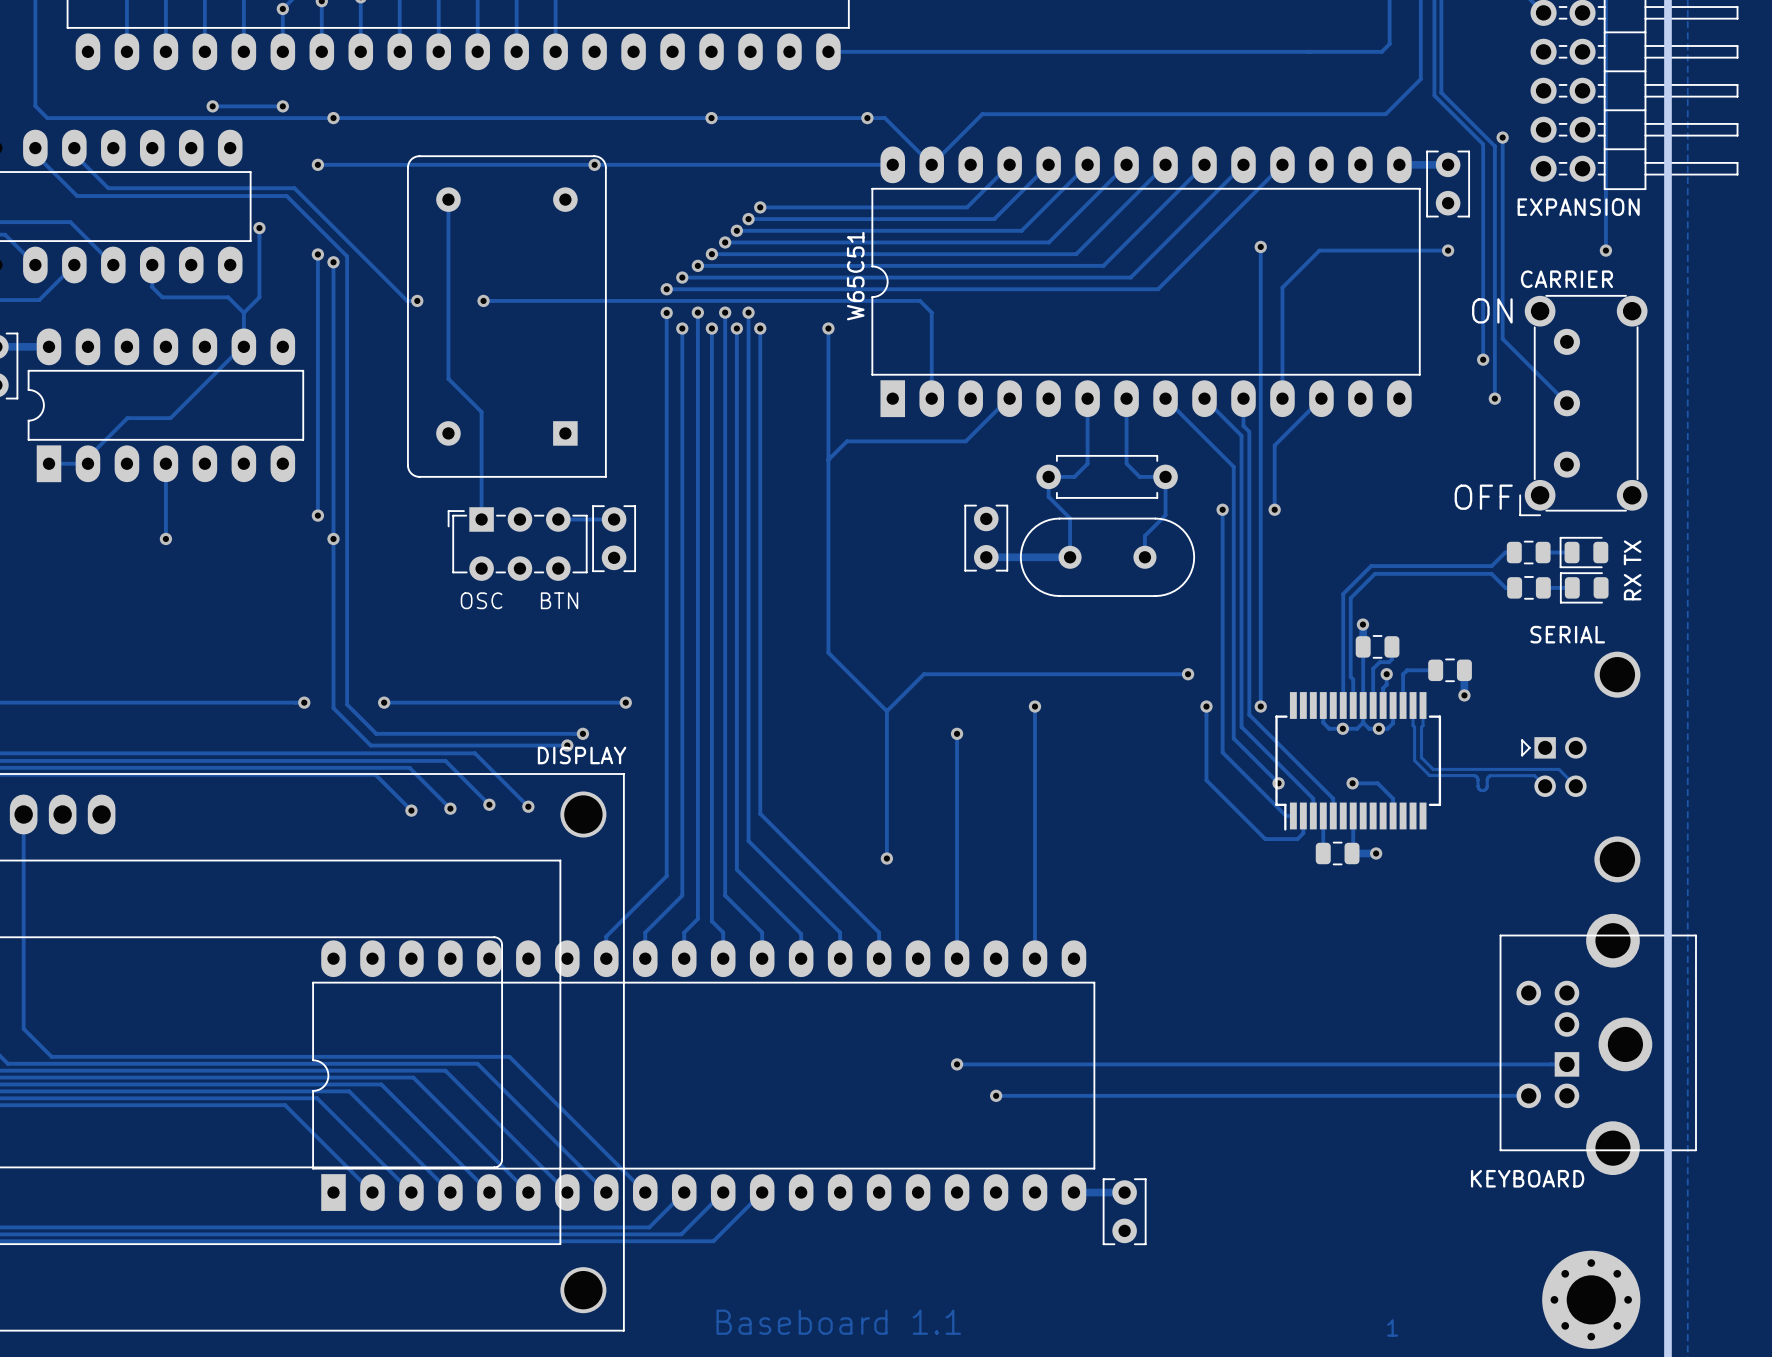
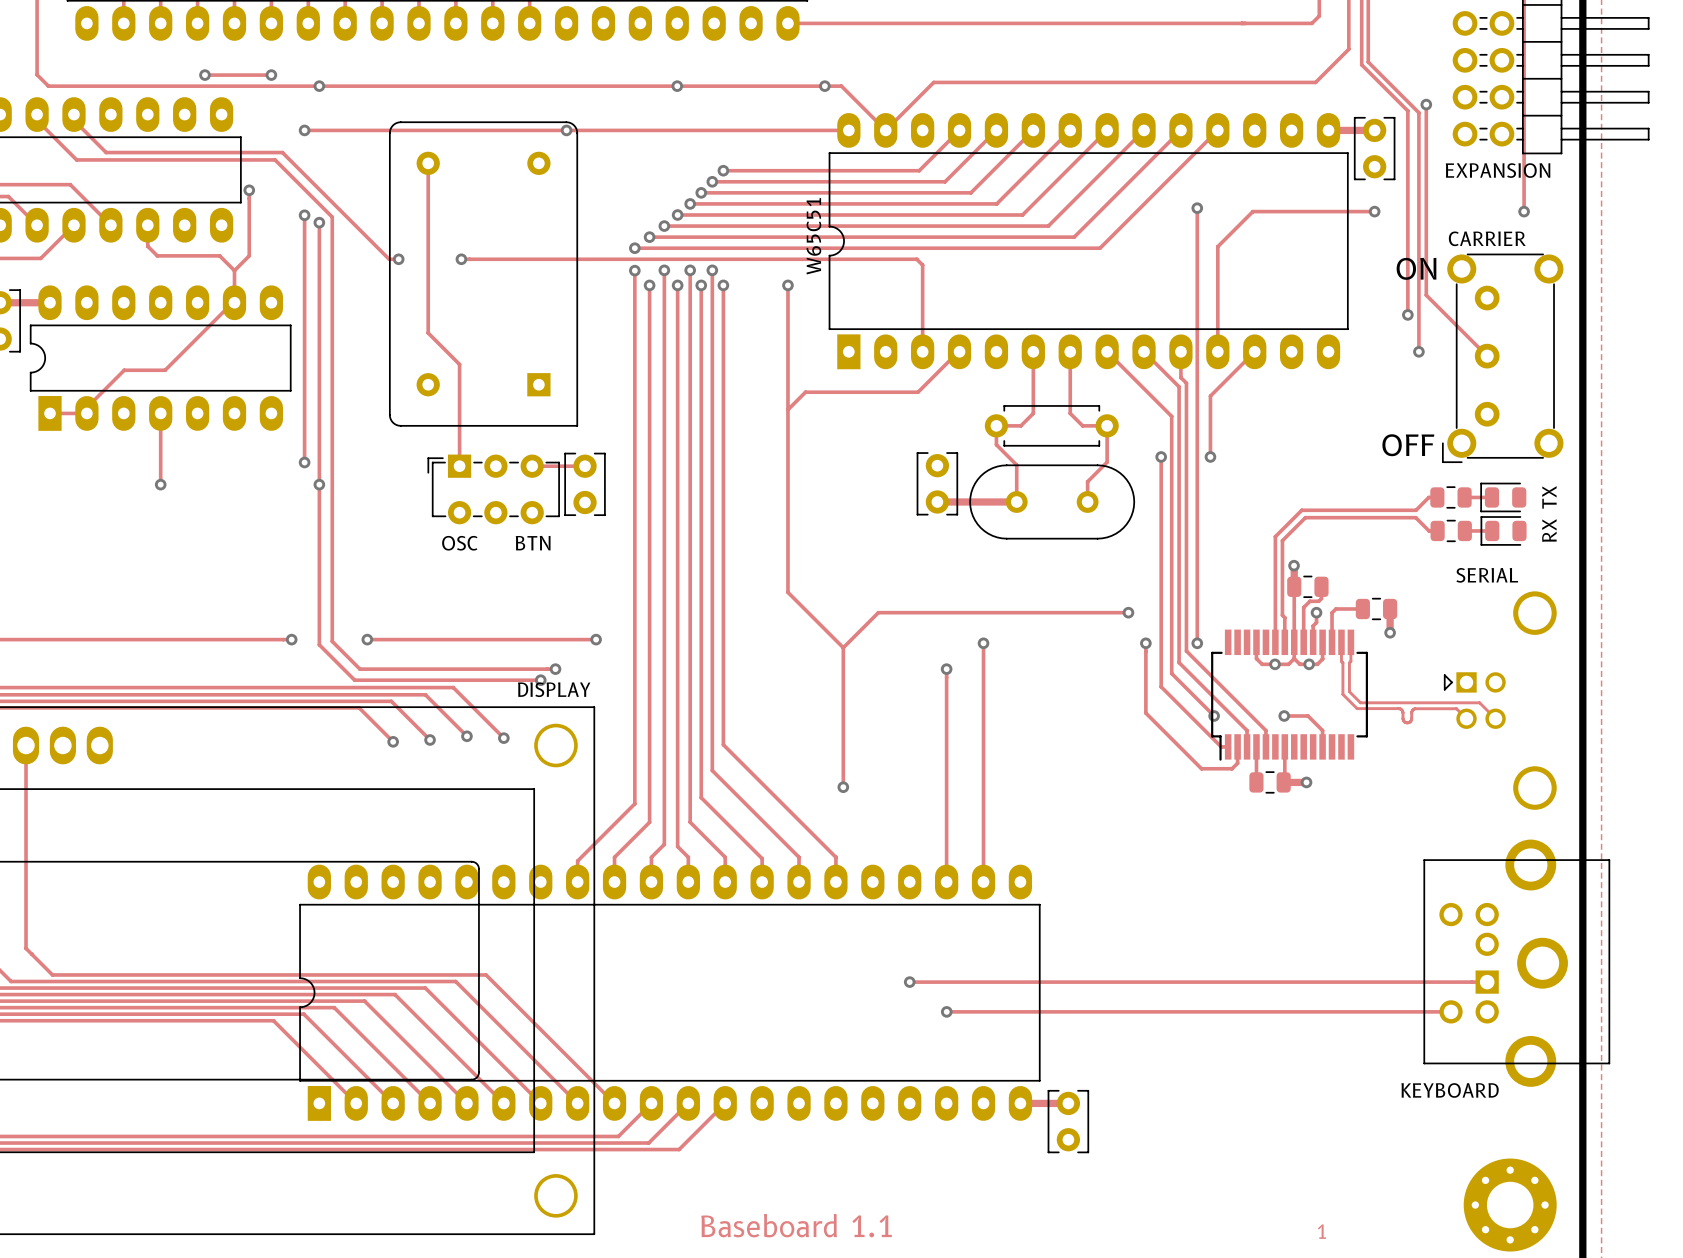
track: (920, 300) (931, 312) (931, 397) -> (874, 259) (916, 259) (922, 265) (922, 351)
track: (957, 733) (957, 958) -> (946, 669) (946, 882)
via position: (957, 733) -> (946, 669)

